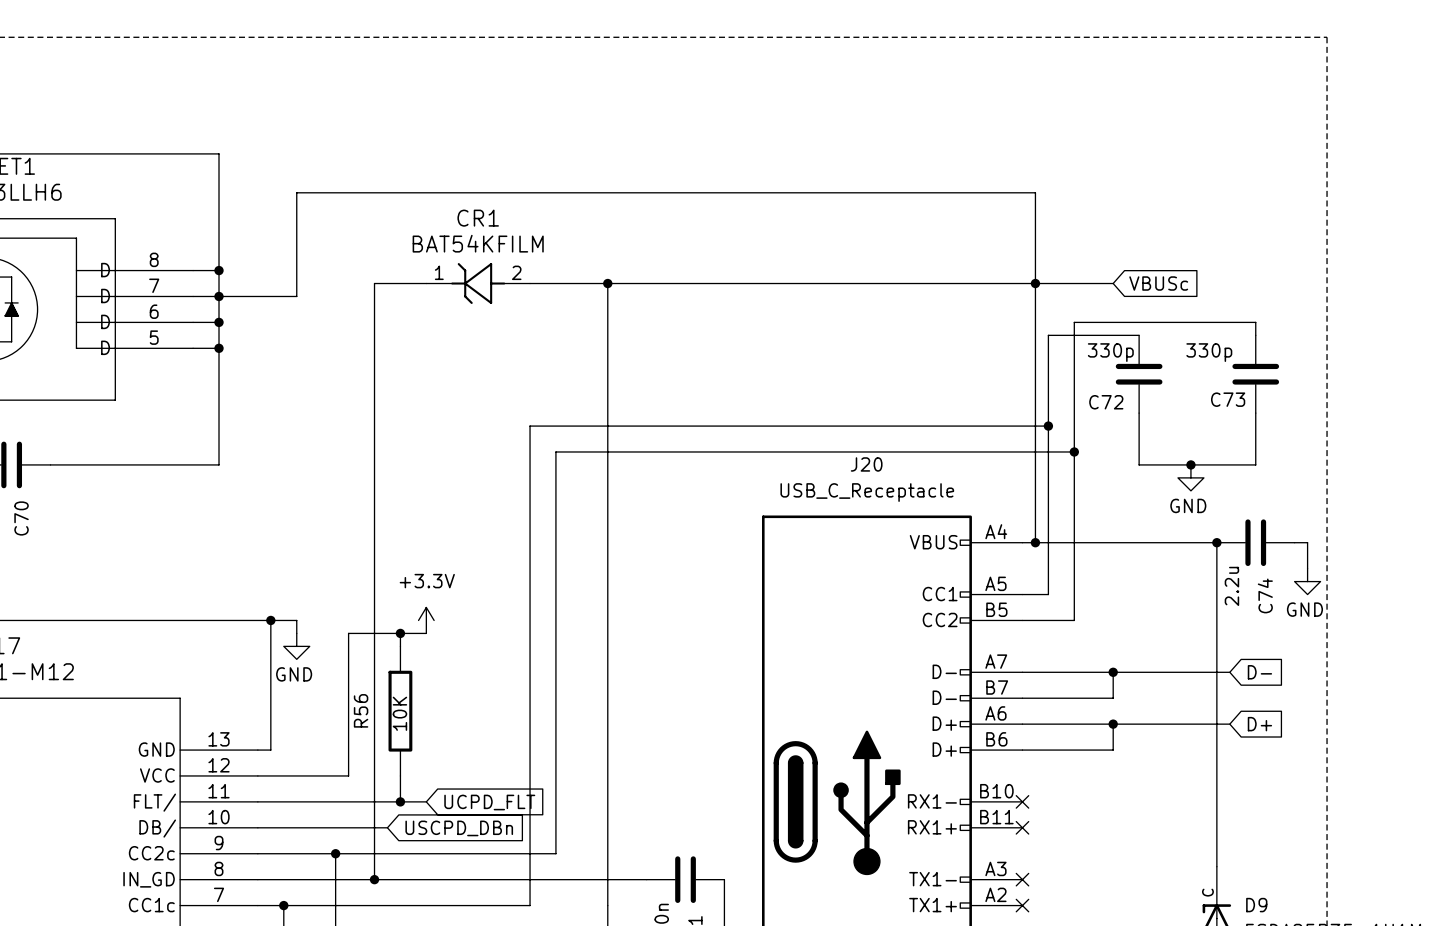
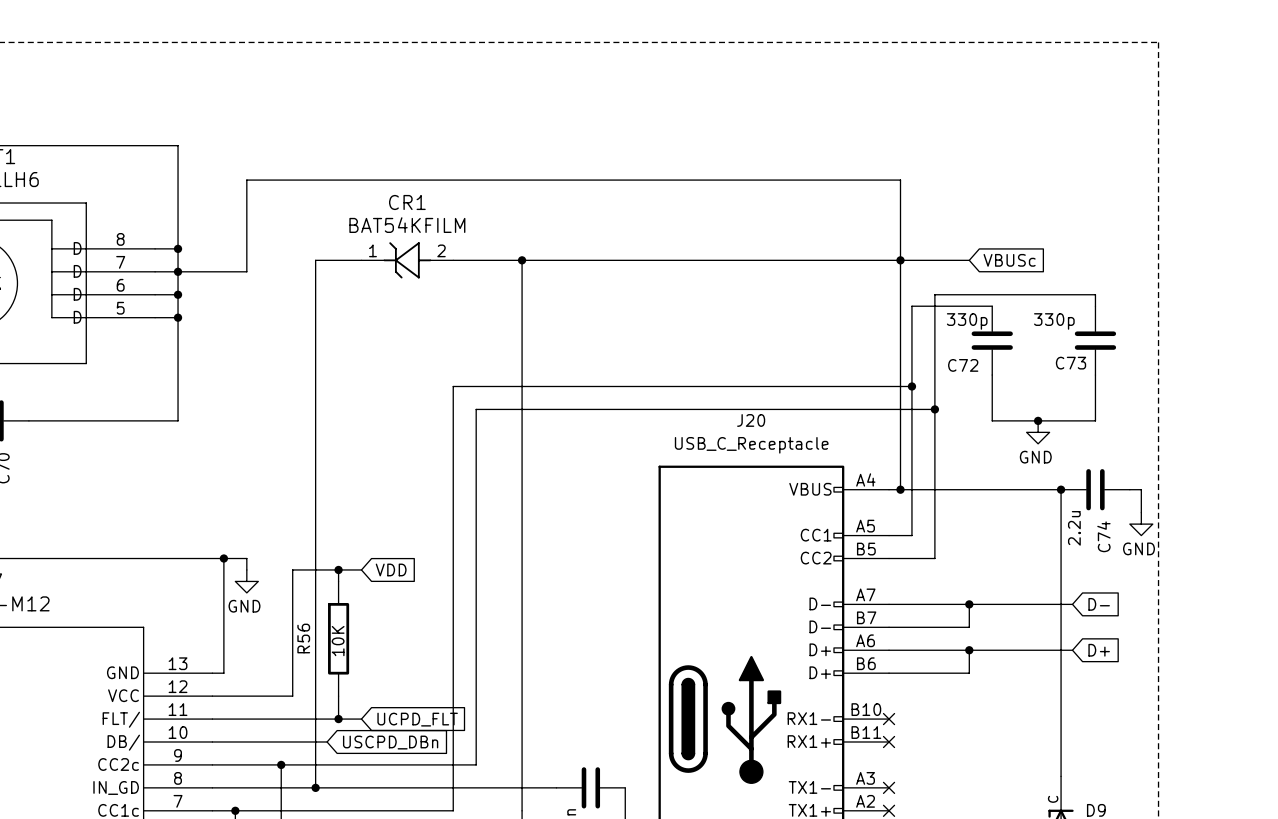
power symbol: +3.3V (426, 620) -> none
global label: none -> VDD (391, 569)

